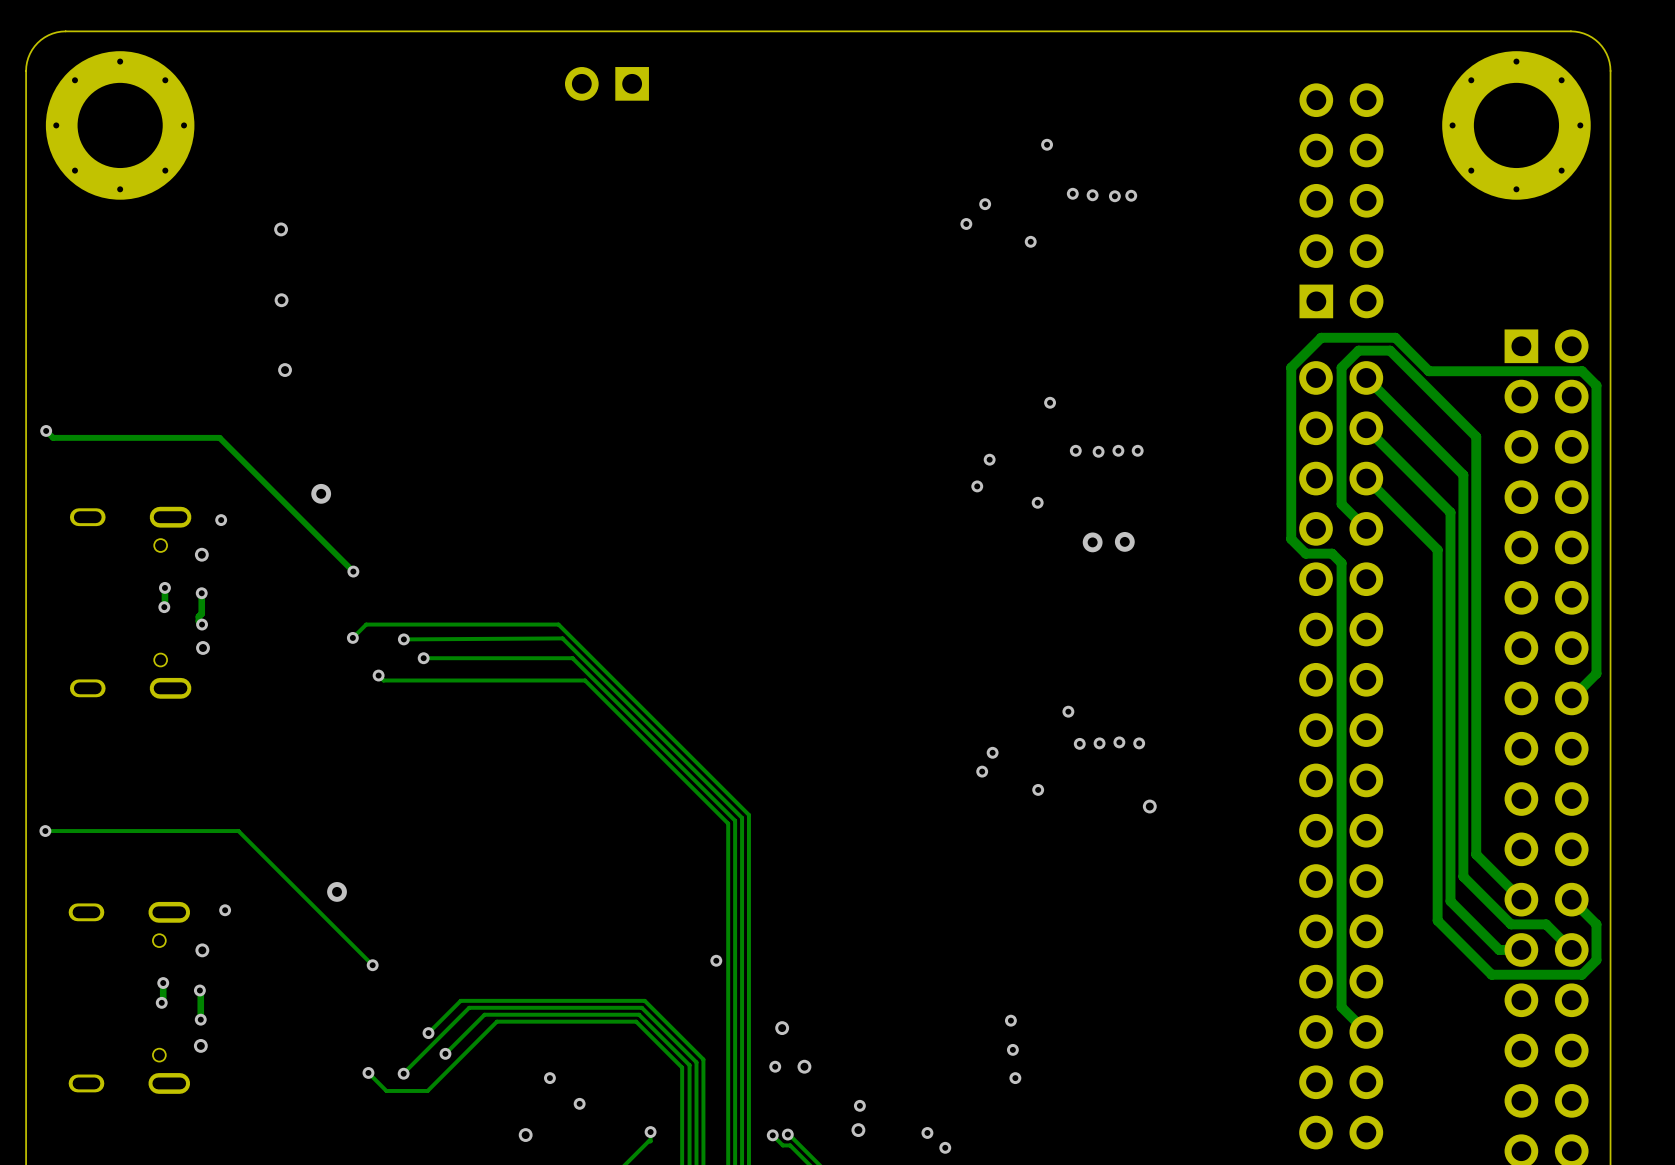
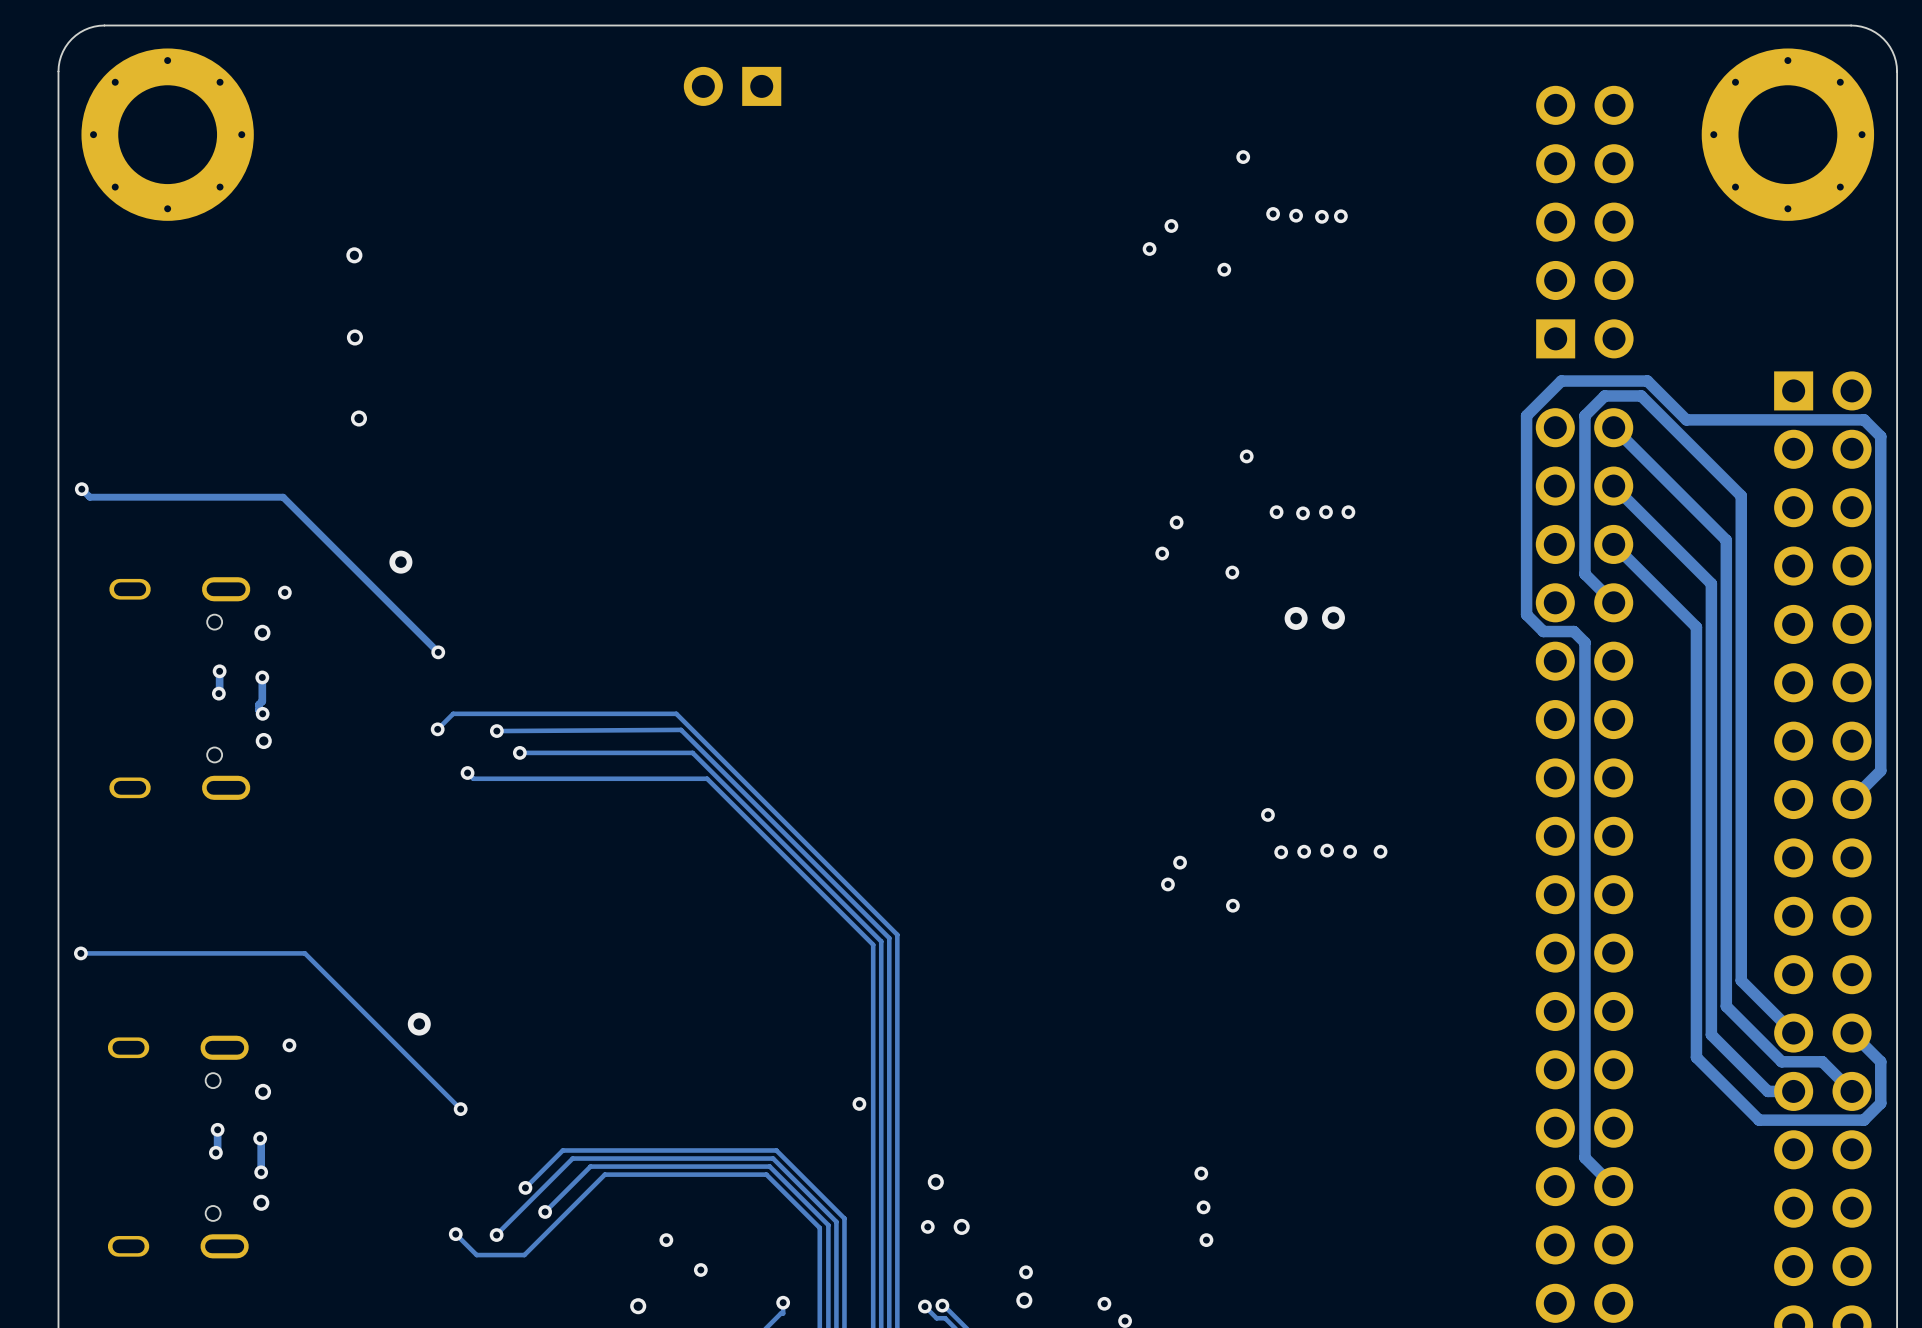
via: none -> (1380, 851)
via: (1149, 806) -> none

